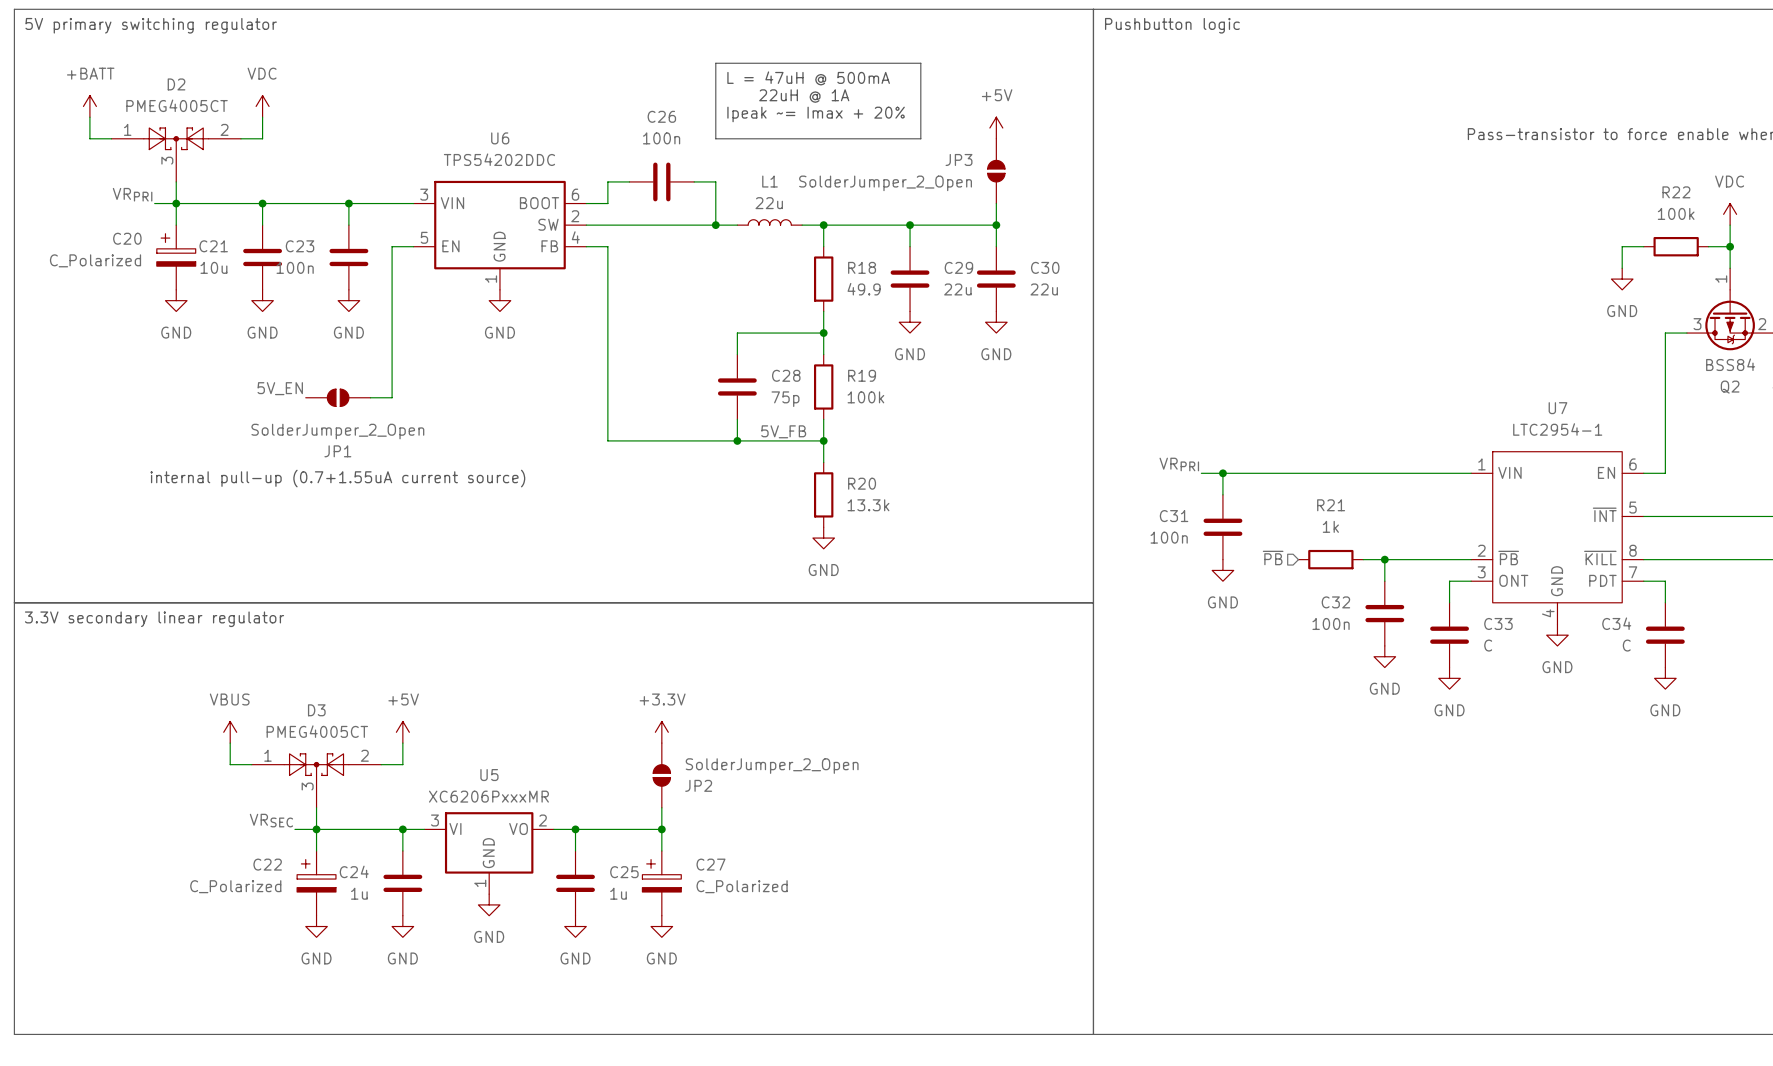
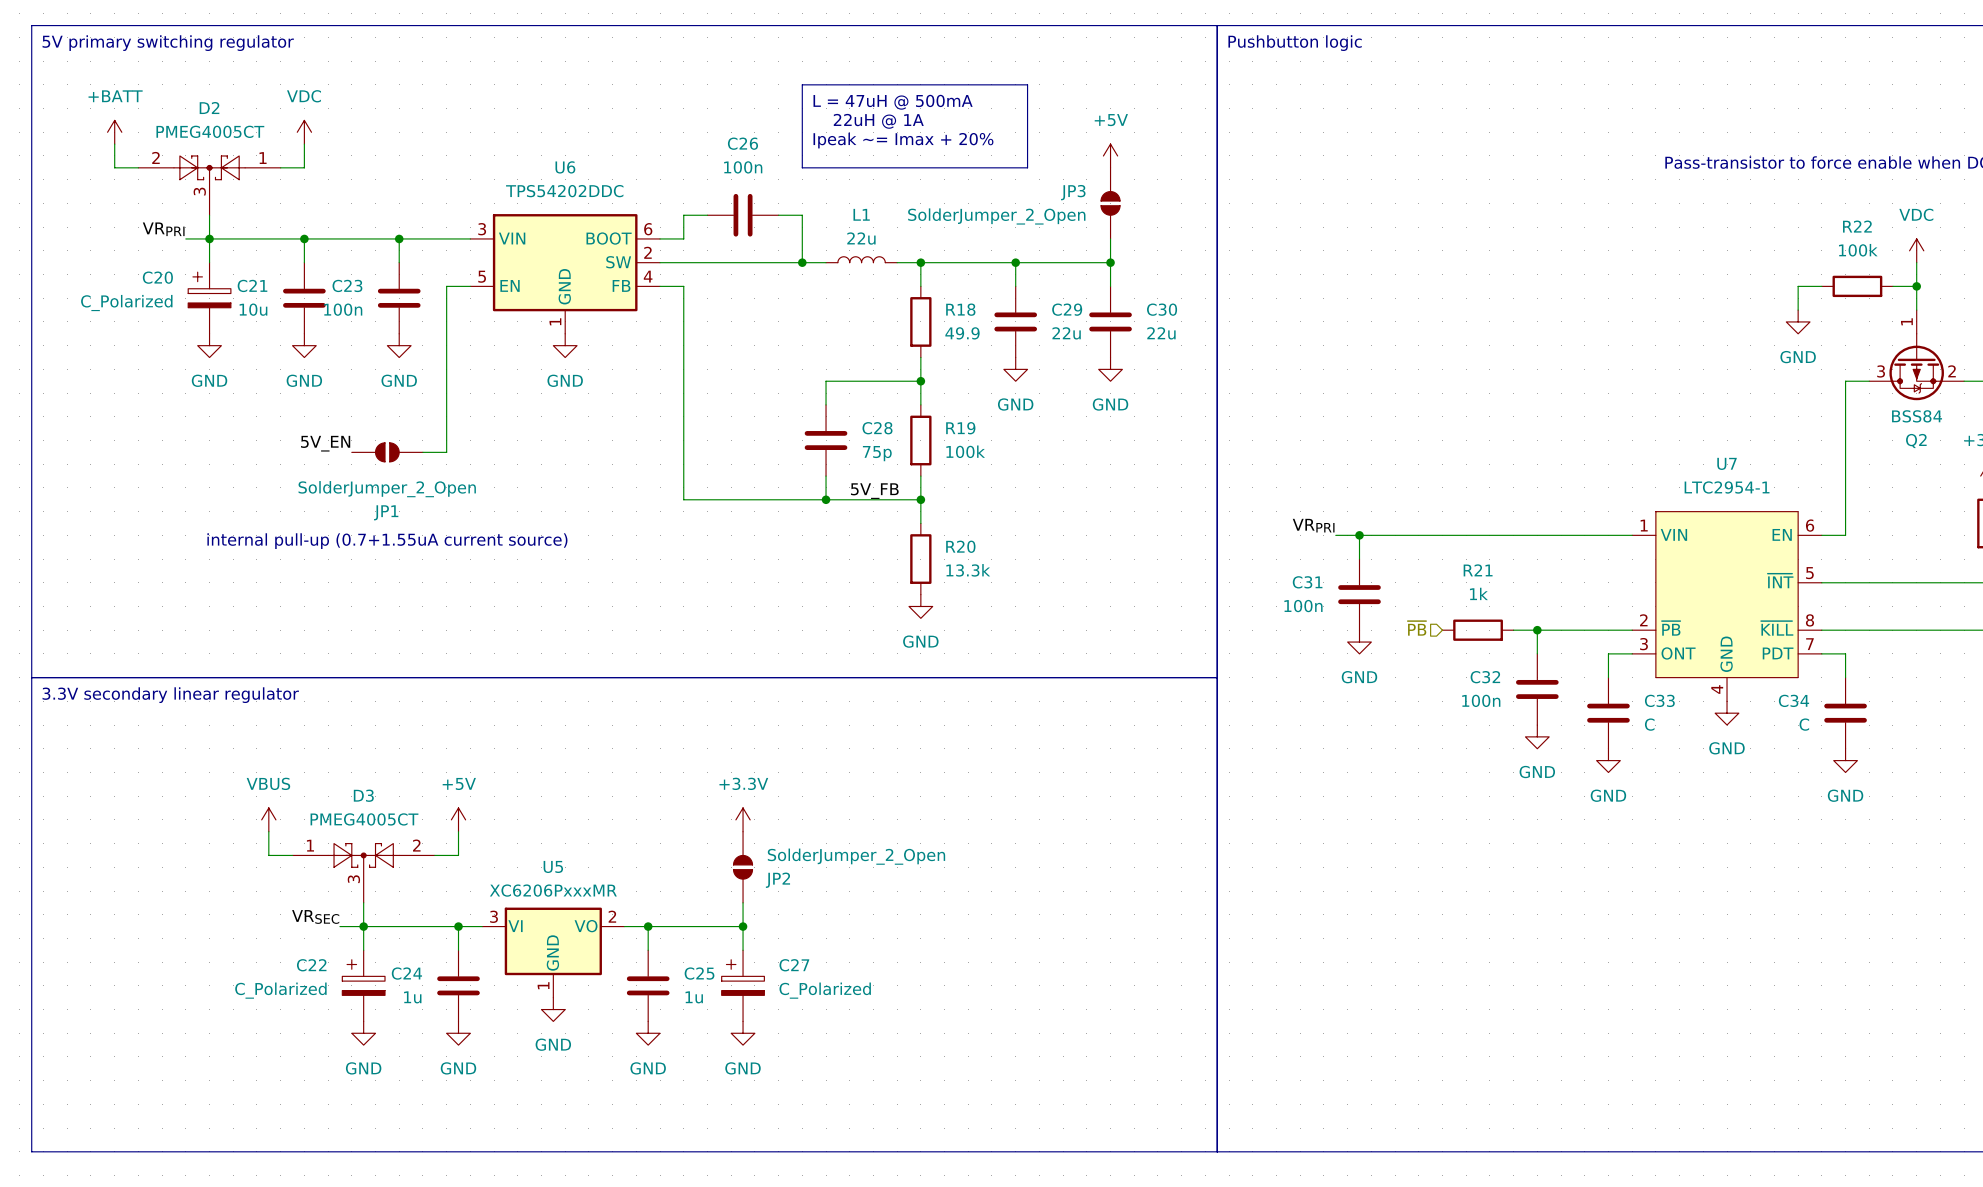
D2 flip: as is (176, 138) -> left-right (209, 167)

